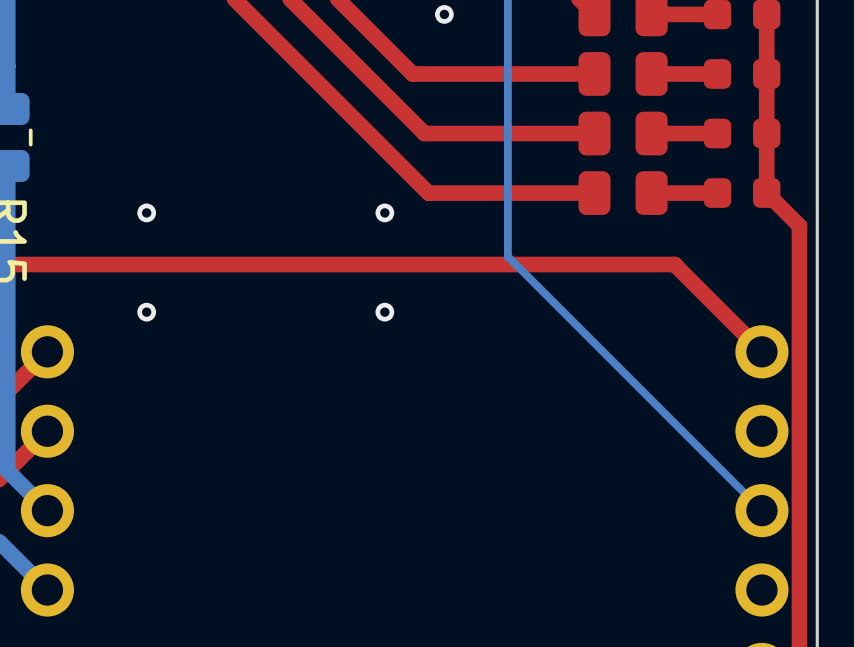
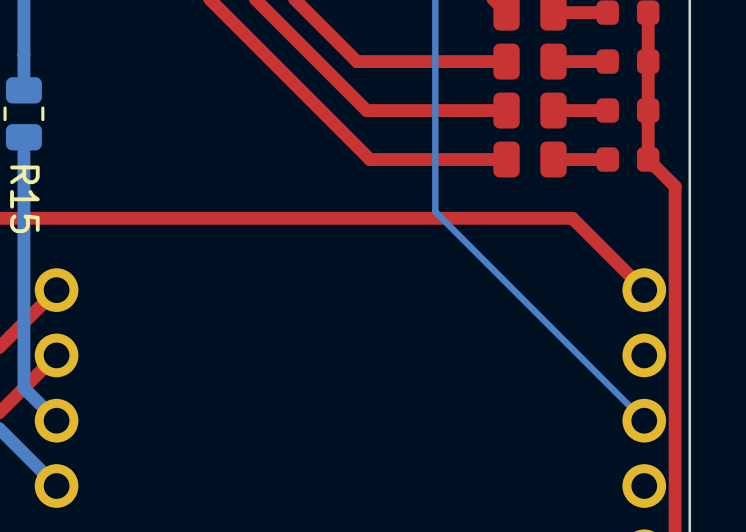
via: (444, 14) -> none
via: (146, 212) -> none
via: (384, 212) -> none
via: (146, 312) -> none
via: (384, 312) -> none

